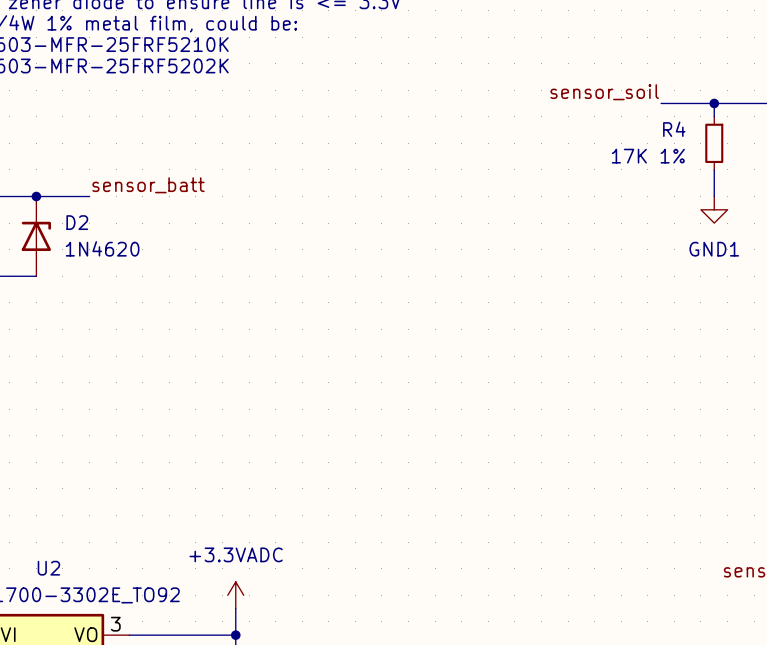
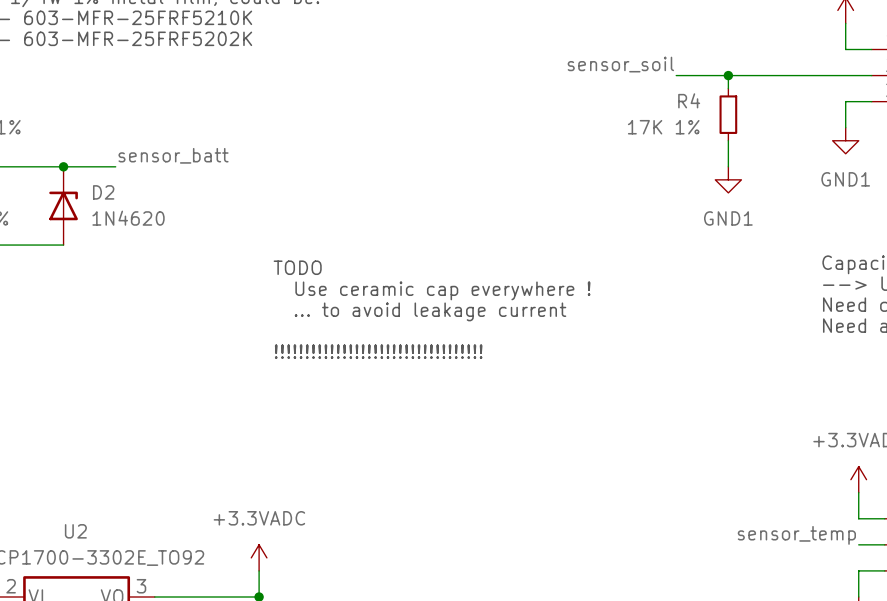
text: none -> TODO (297, 267)
text: none -> Use ceramic cap everywhere ! (442, 290)
text: none -> ... to avoid leakage current (430, 311)
text: none -> !!!!!!!!!!!!!!!!!!!!!!!!!!!!!!!!!! (378, 351)

